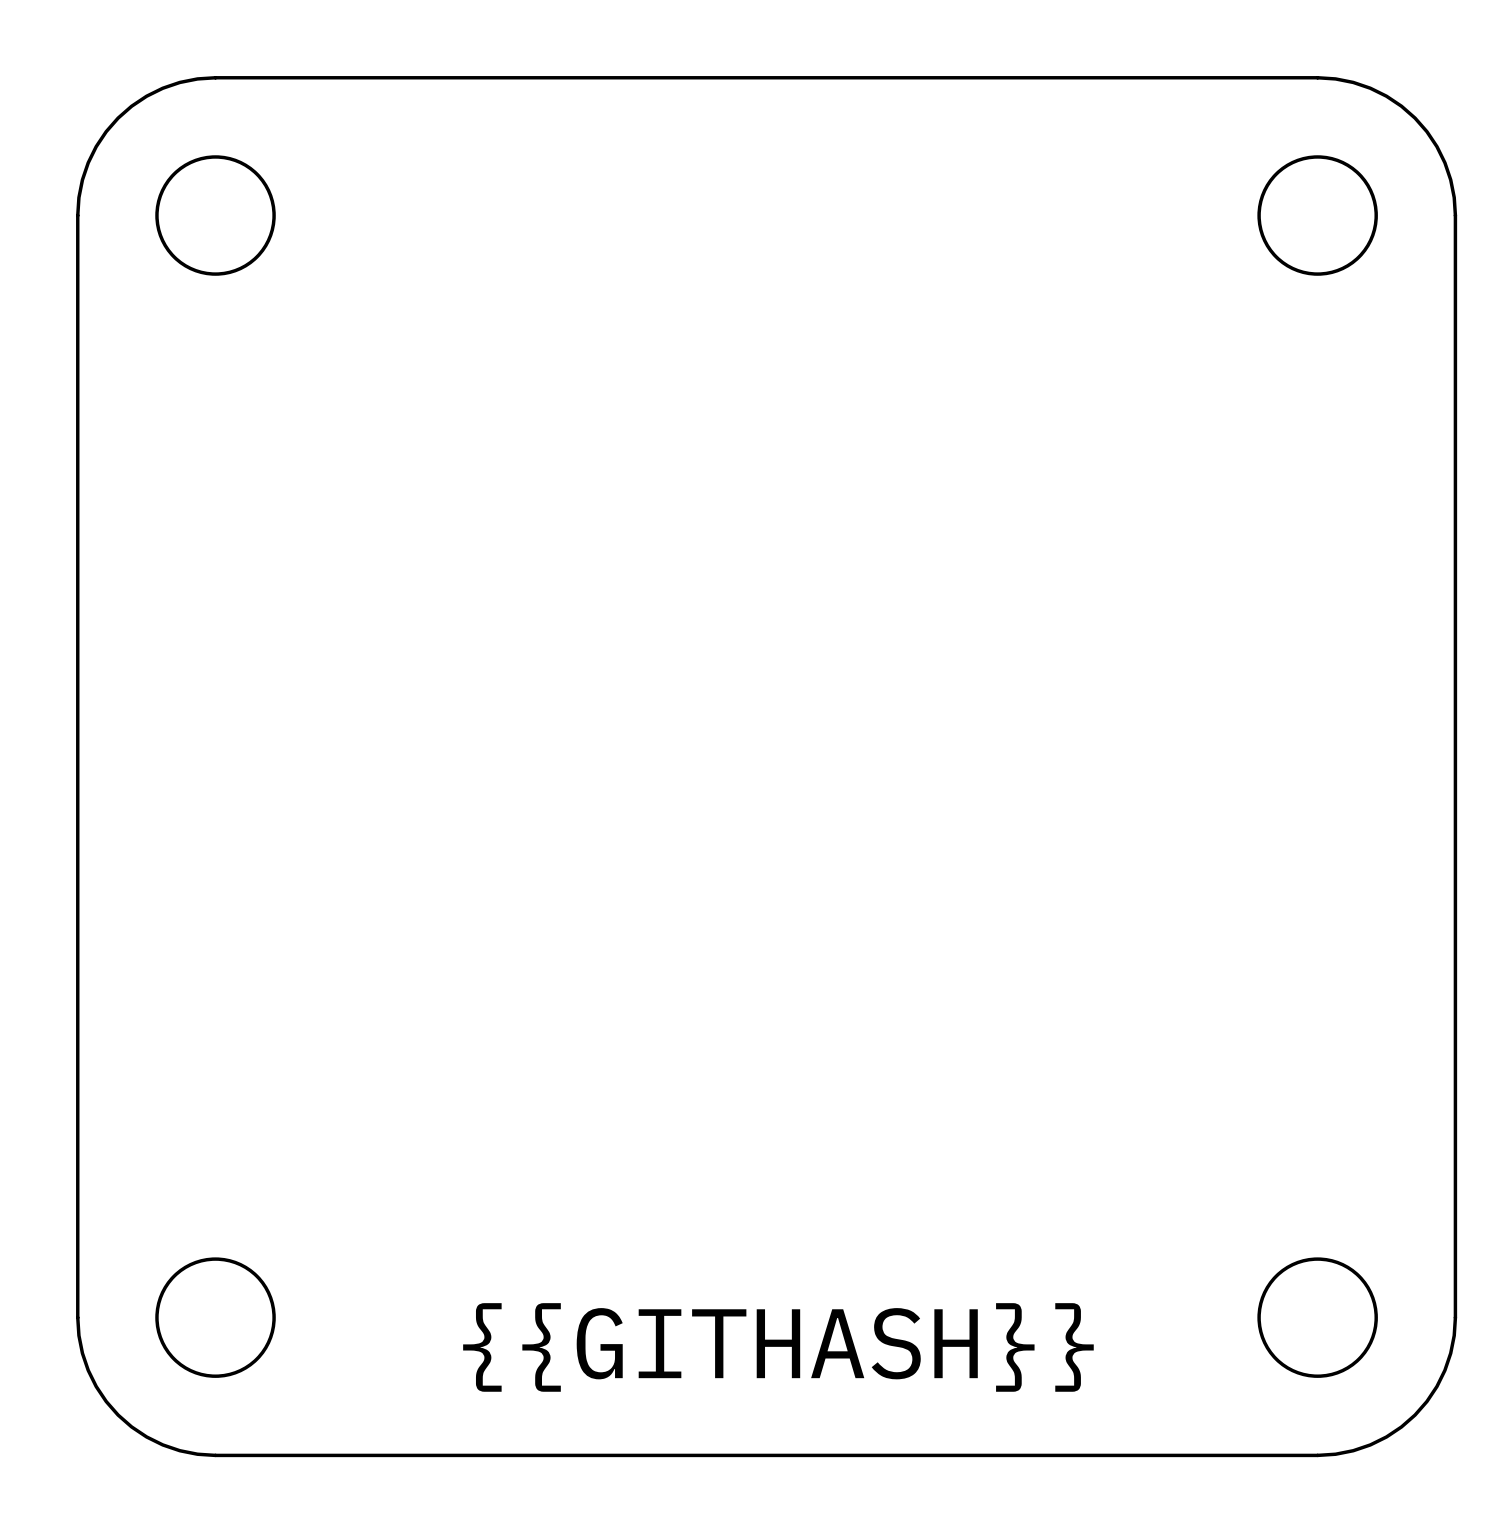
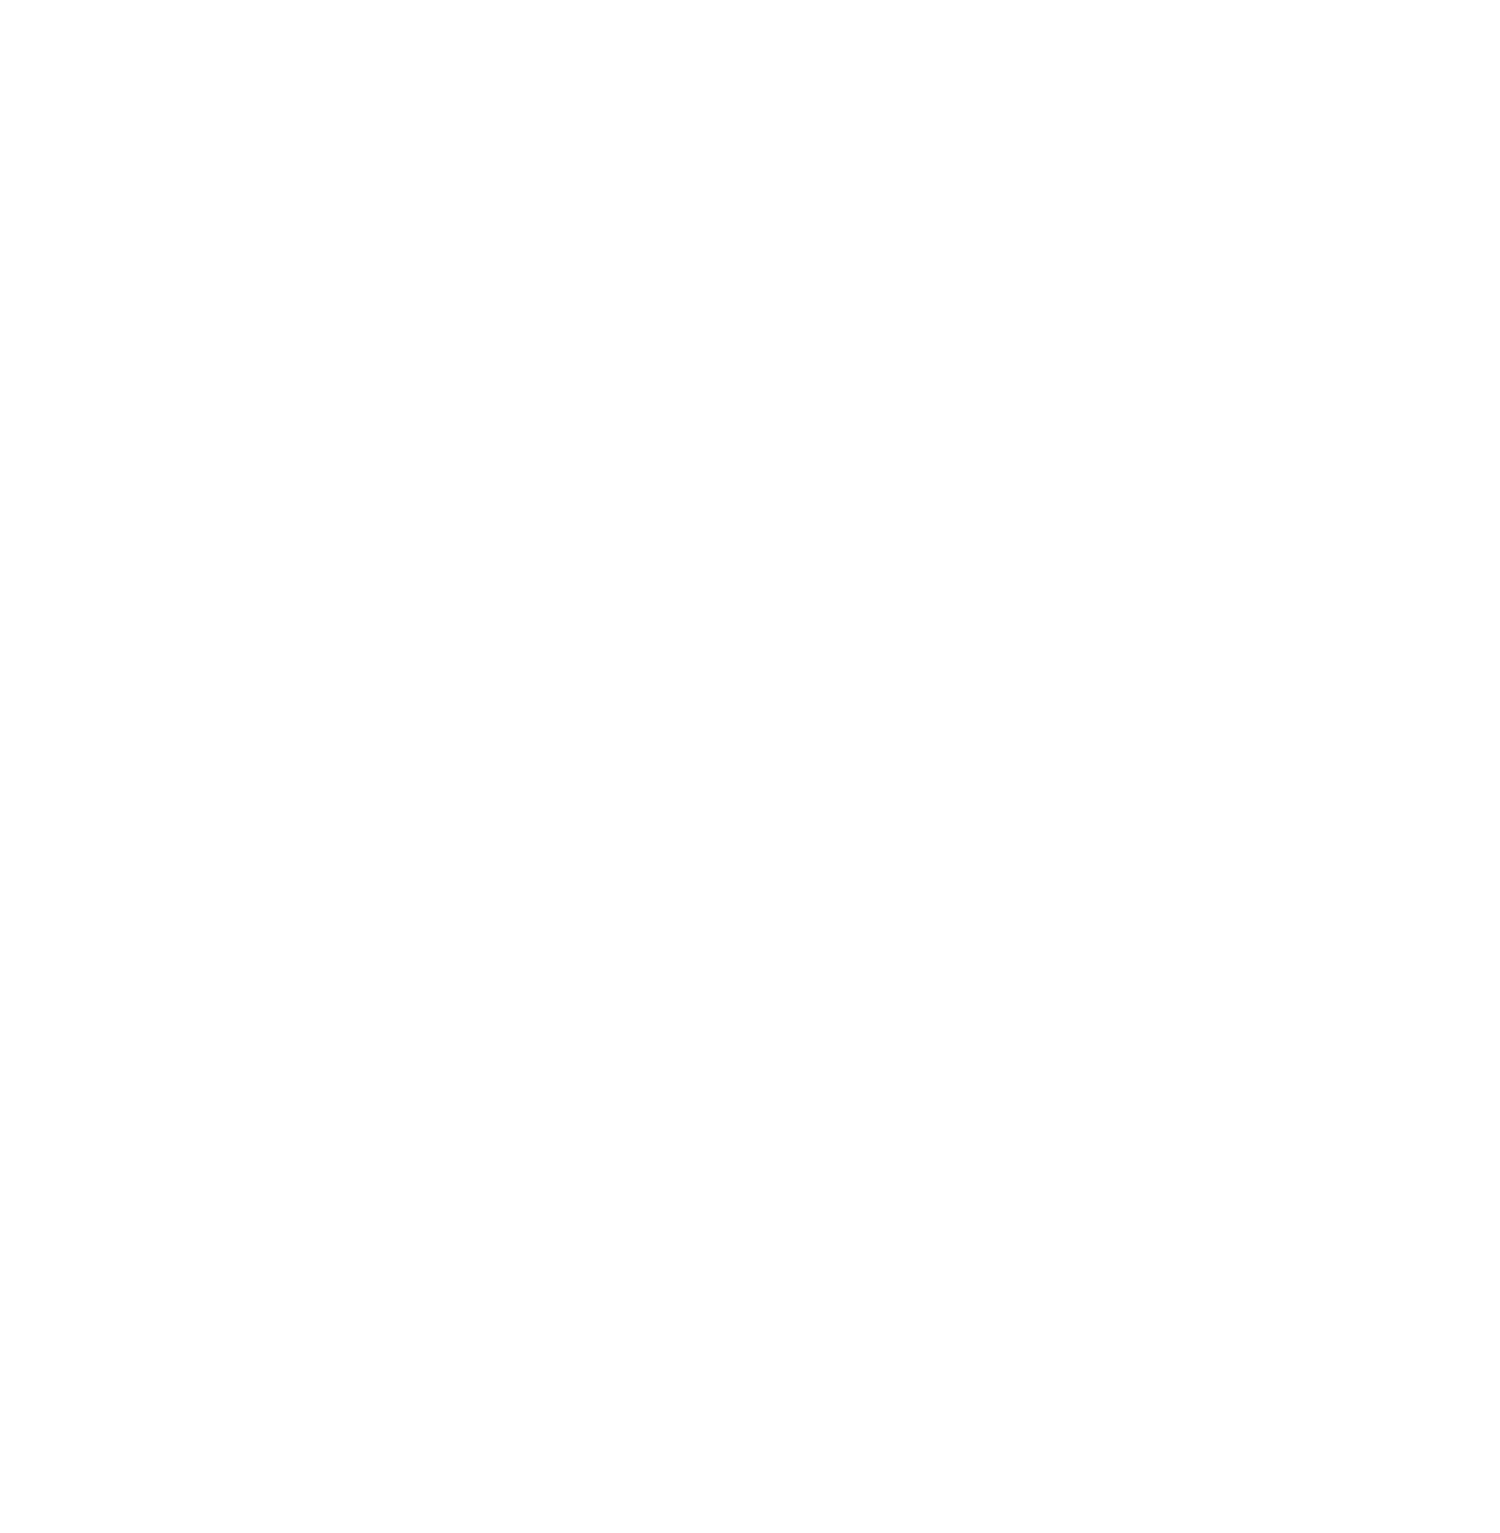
board edge: (215, 77) (1317, 77) (1353, 82) (1370, 88) (1386, 96) (1415, 118) (1436, 146) (1444, 162) (1454, 197) (1455, 215) (1455, 1317) (1450, 1353) (1444, 1370) (1436, 1386) (1415, 1415) (1401, 1426) (1370, 1444) (1353, 1450) (1317, 1455) (215, 1455) (179, 1450) (162, 1444) (131, 1426) (118, 1415) (106, 1401) (88, 1370) (82, 1353) (77, 1317) (78, 197) (88, 162) (96, 146) (118, 118) (131, 106) (162, 88) (179, 82) (215, 77) -> none
round board edge: [155, 155, 276, 276] -> none
round board edge: [1257, 155, 1378, 276] -> none
round board edge: [155, 1257, 276, 1378] -> none
round board edge: [1257, 1257, 1378, 1378] -> none
text: {{GITHASH}} (778, 1347) -> none

